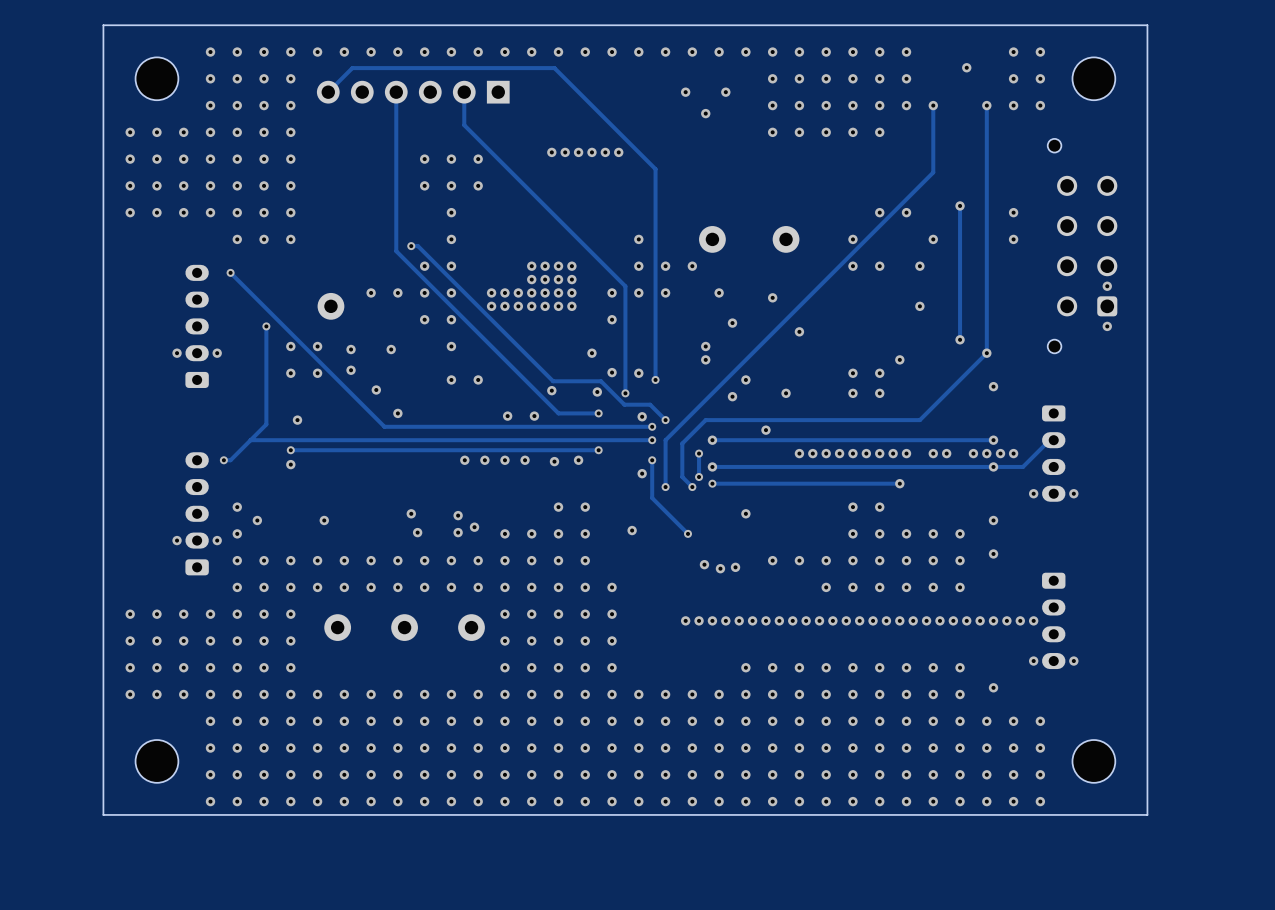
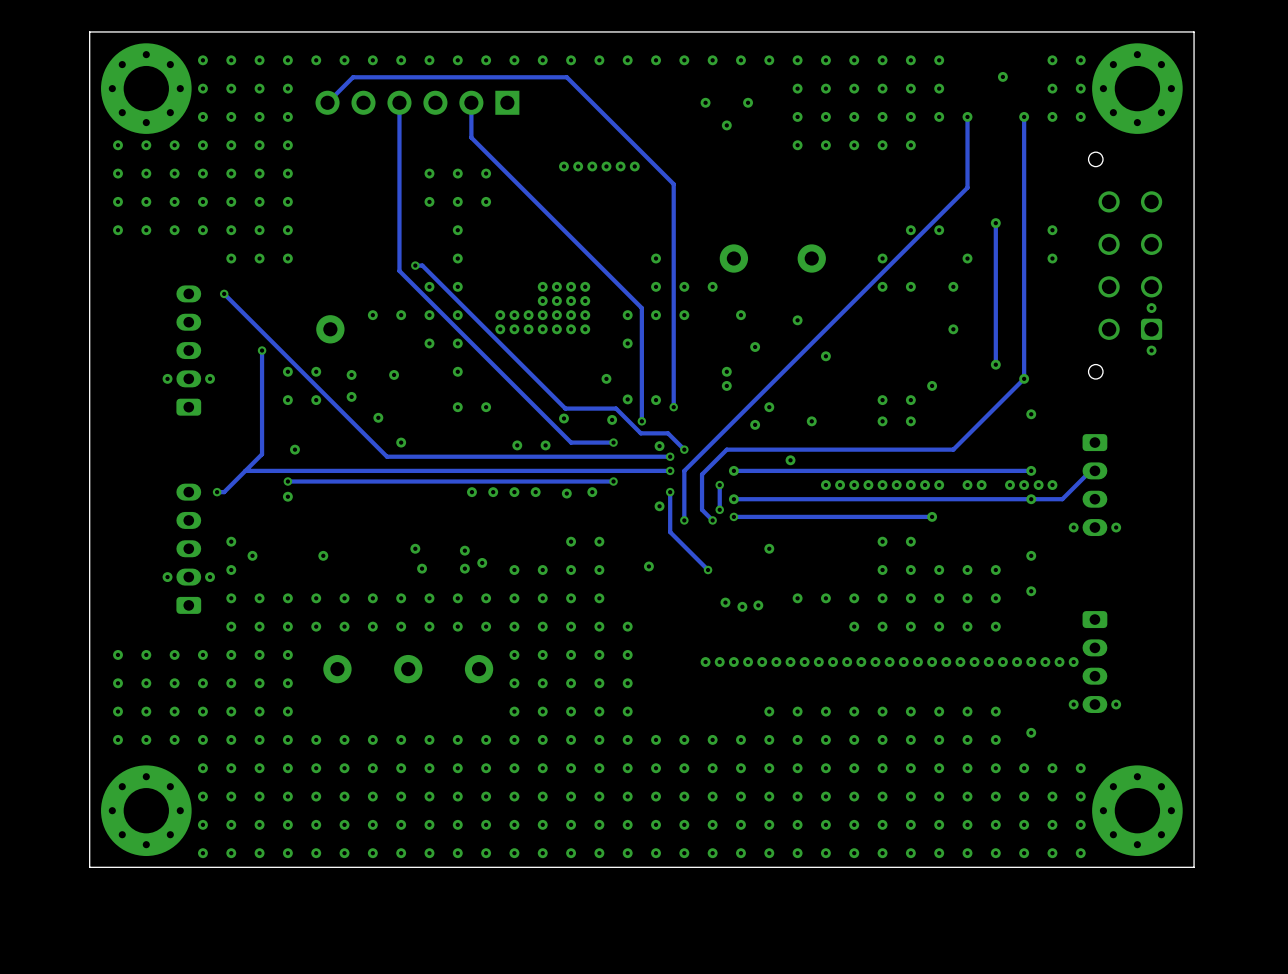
part footprint: [135, 57, 179, 101] -> [101, 43, 192, 134]
part footprint: [1072, 57, 1116, 101] -> [1092, 43, 1183, 134]
part footprint: [135, 740, 179, 783] -> [101, 765, 192, 857]
part footprint: [1072, 740, 1116, 783] -> [1092, 765, 1183, 857]

